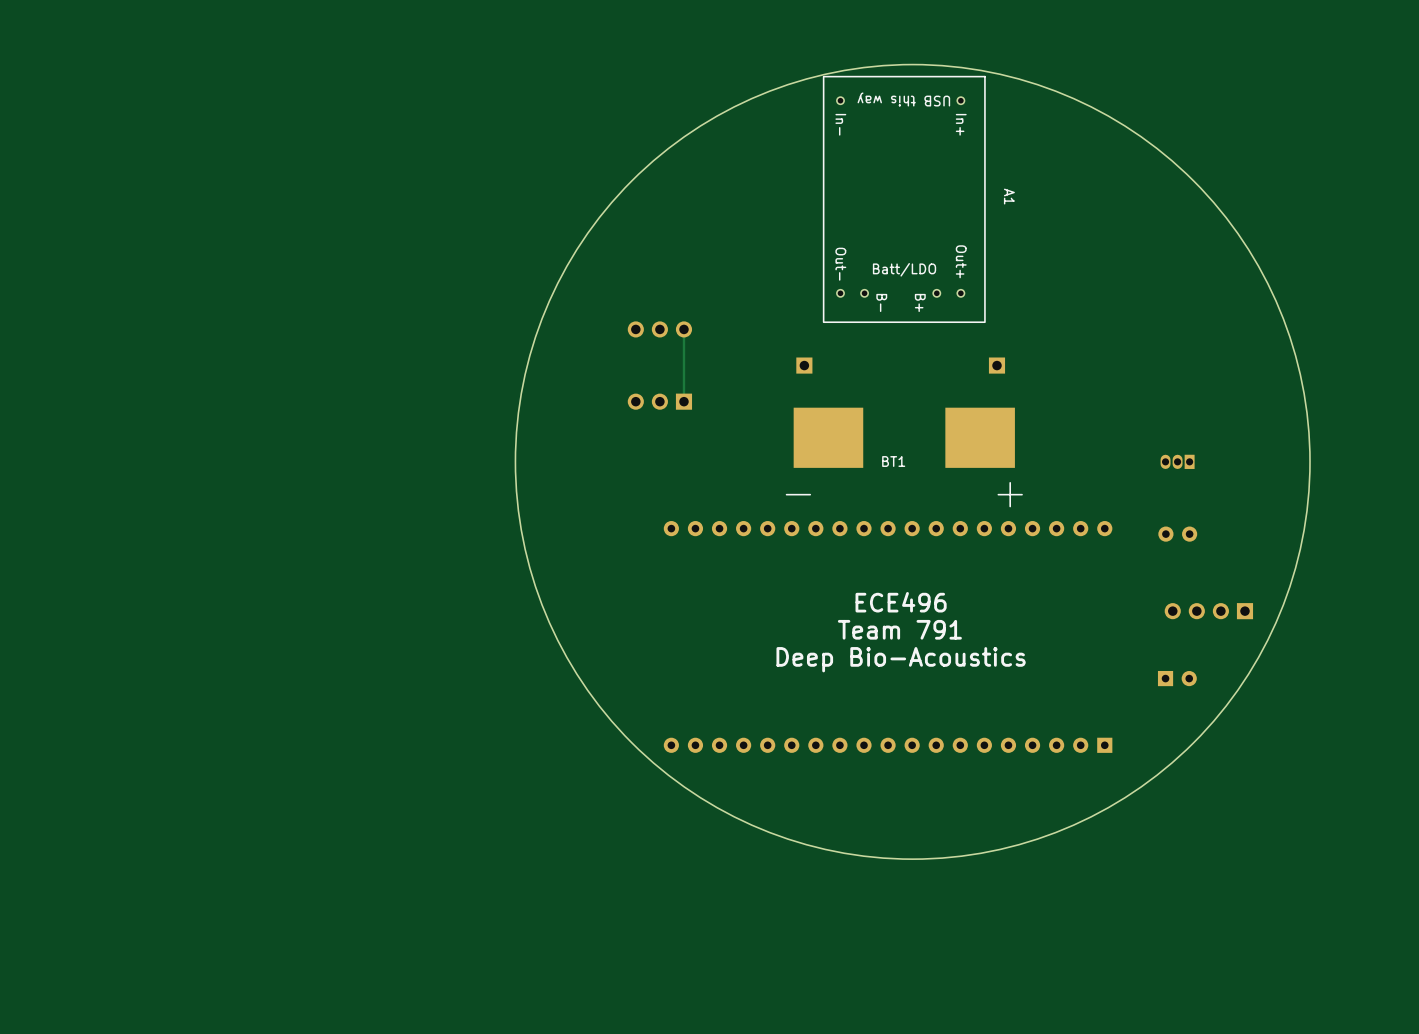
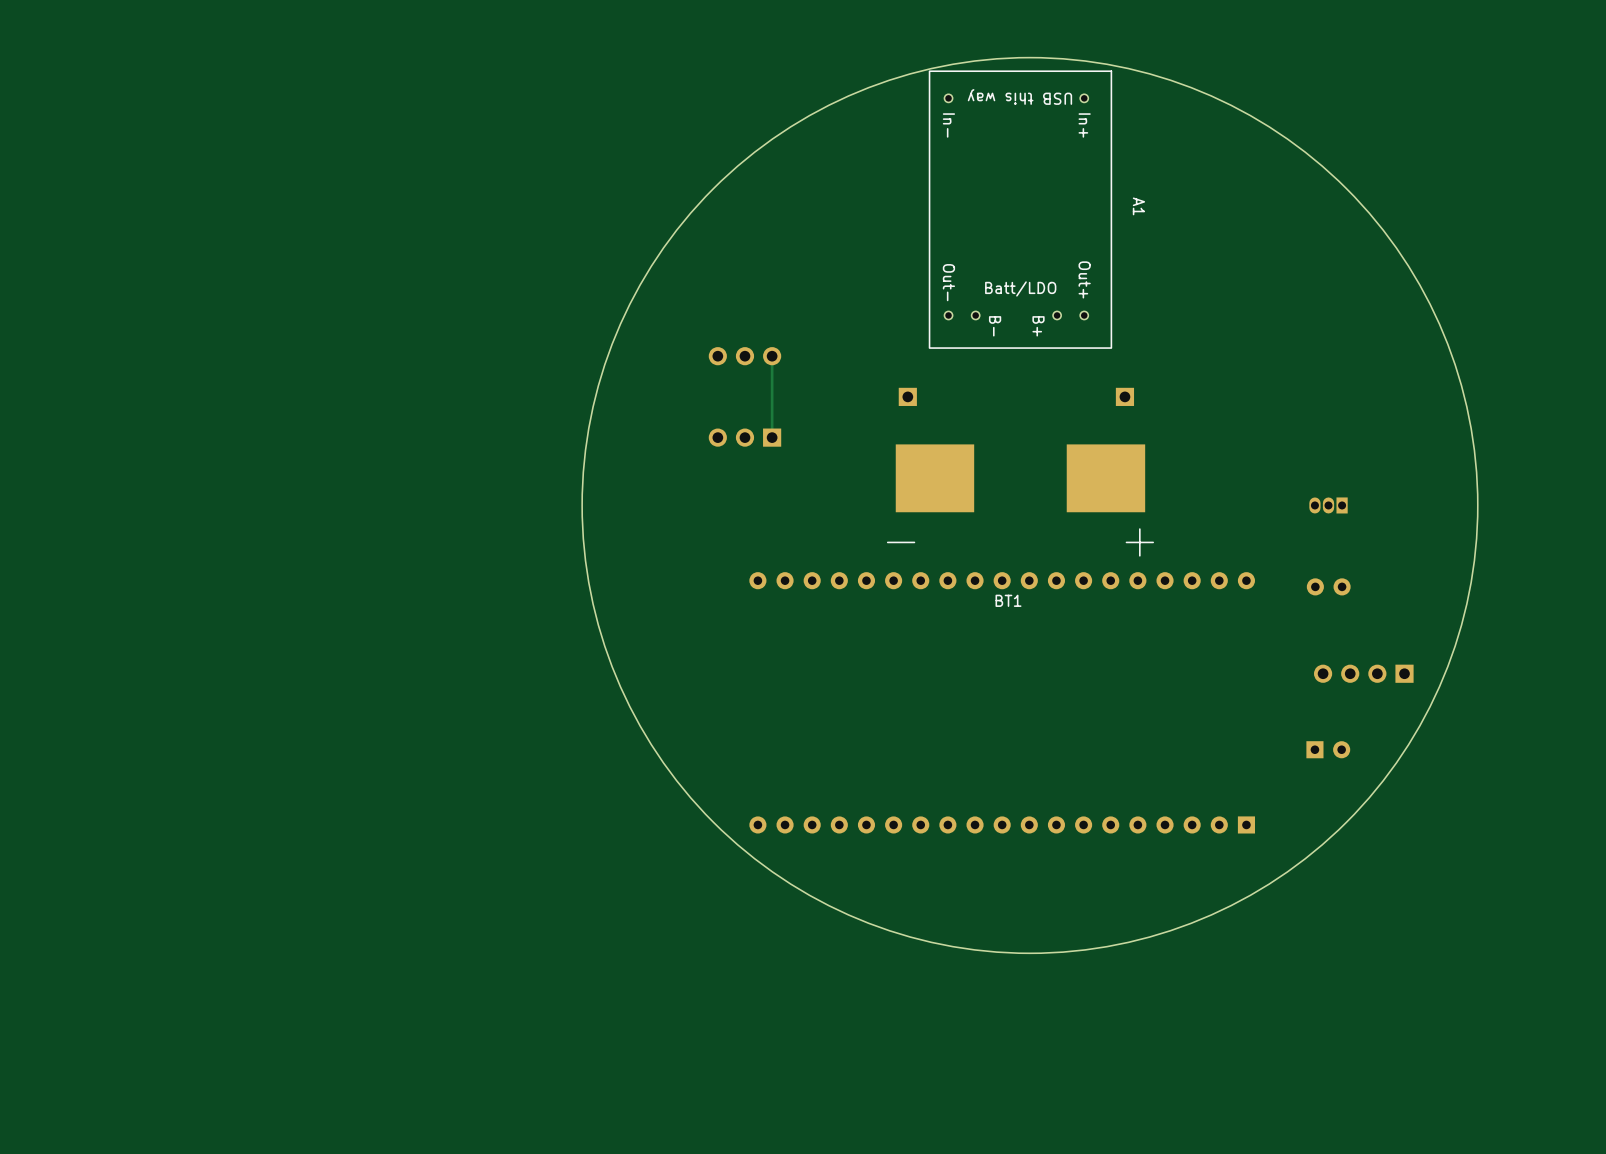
BT1 name position: BT1 (893, 461) -> BT1 (1008, 600)
text: ECE496 (901, 602) -> none
text: Team 791 (899, 629) -> none
text: Deep Bio-Acoustics (901, 659) -> none

